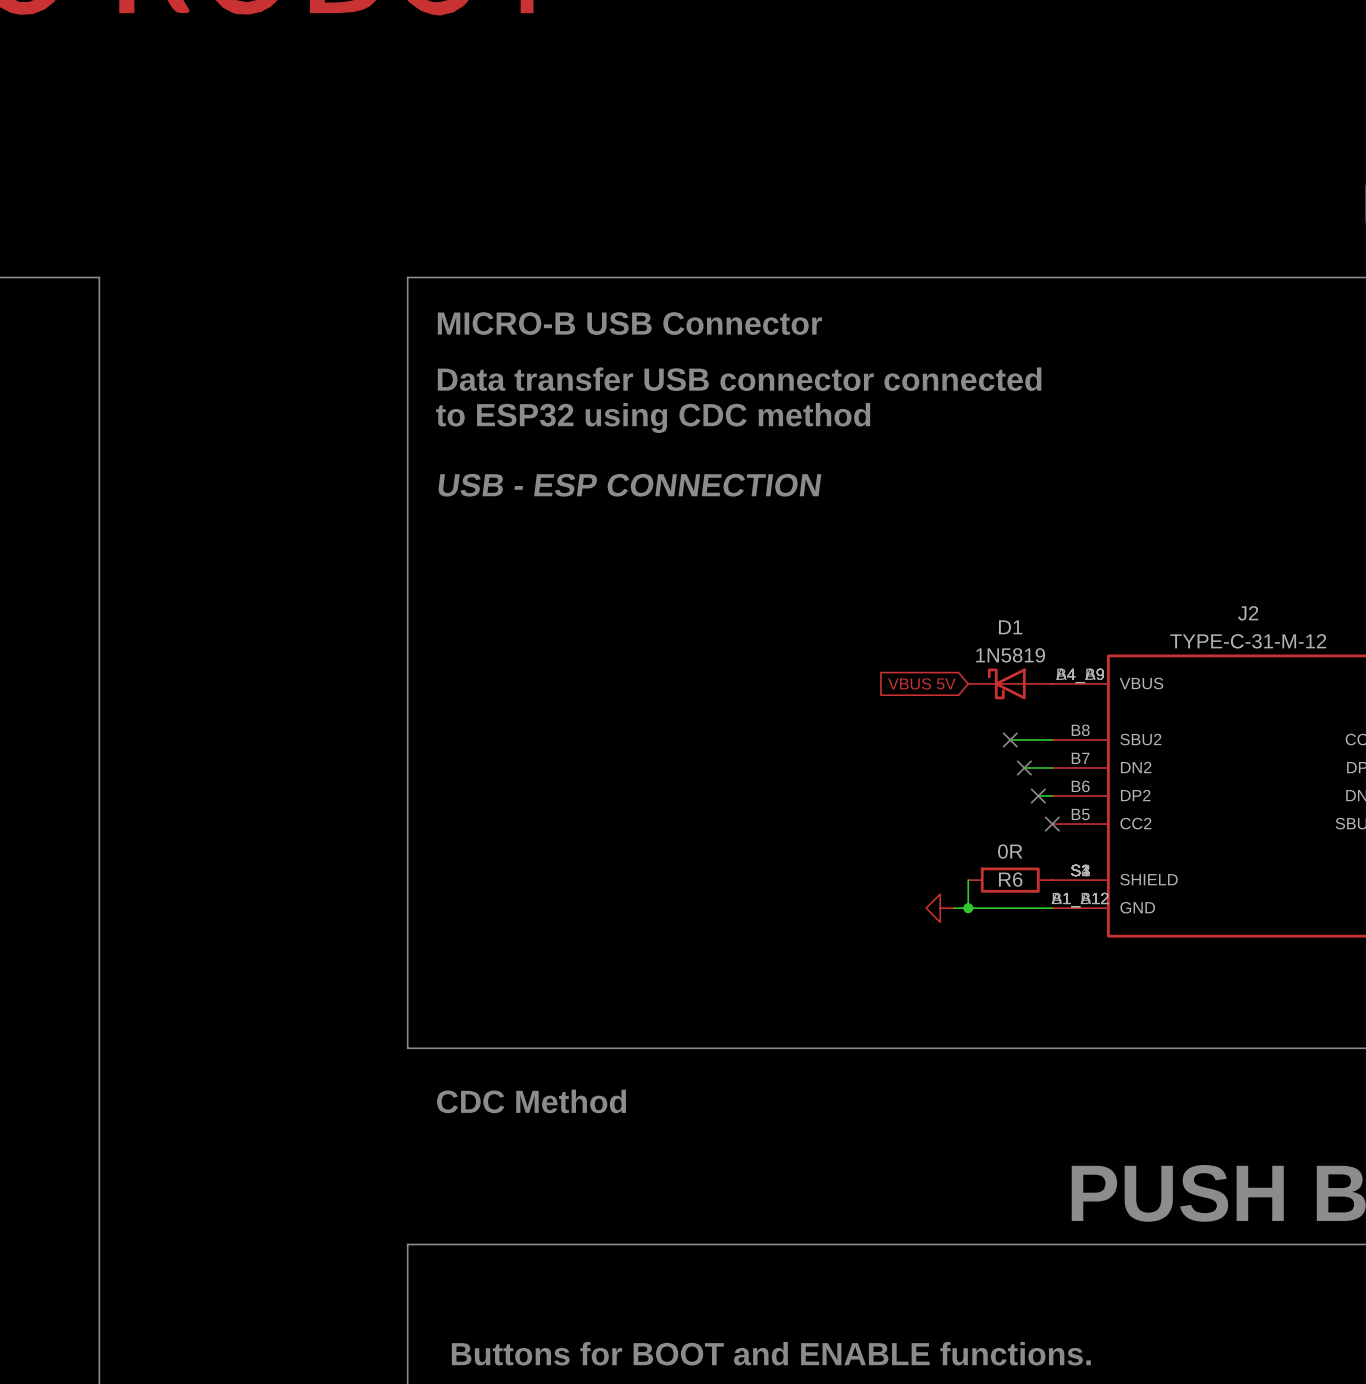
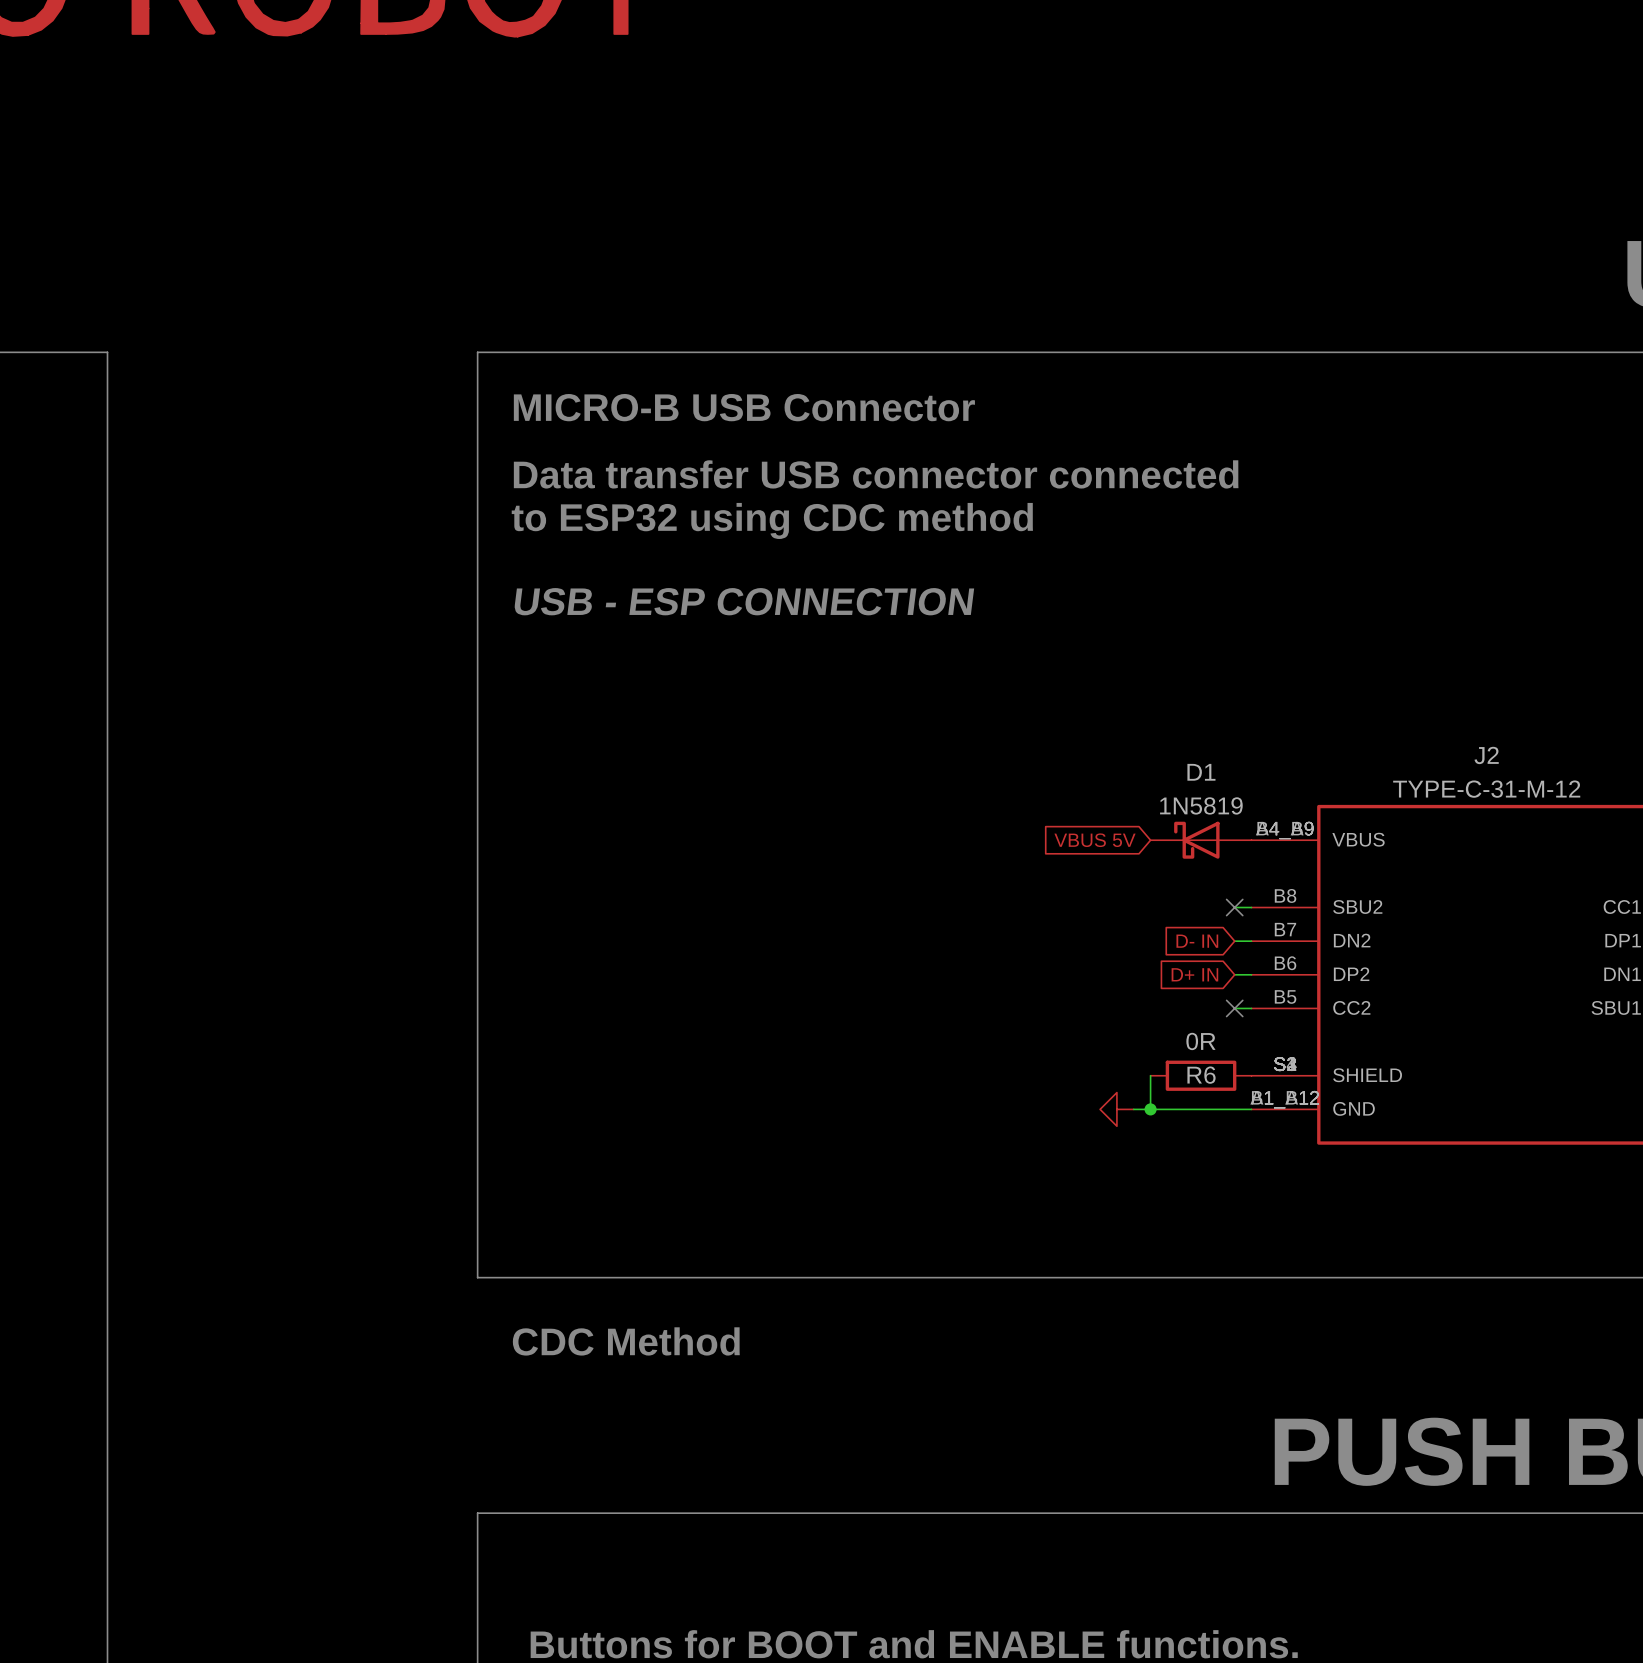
wire: (1010, 739) (1038, 739) -> none
no-connect mark: (1010, 739) -> none
no-connect mark: none -> (1234, 907)
global label: none -> D- IN (1197, 941)
wire: (1024, 768) (1038, 768) -> (1234, 1008) (1251, 1008)
no-connect mark: (1024, 768) -> none
global label: none -> D+ IN (1194, 974)
no-connect mark: (1038, 796) -> none
no-connect mark: none -> (1234, 1008)
no-connect mark: (1052, 824) -> none

